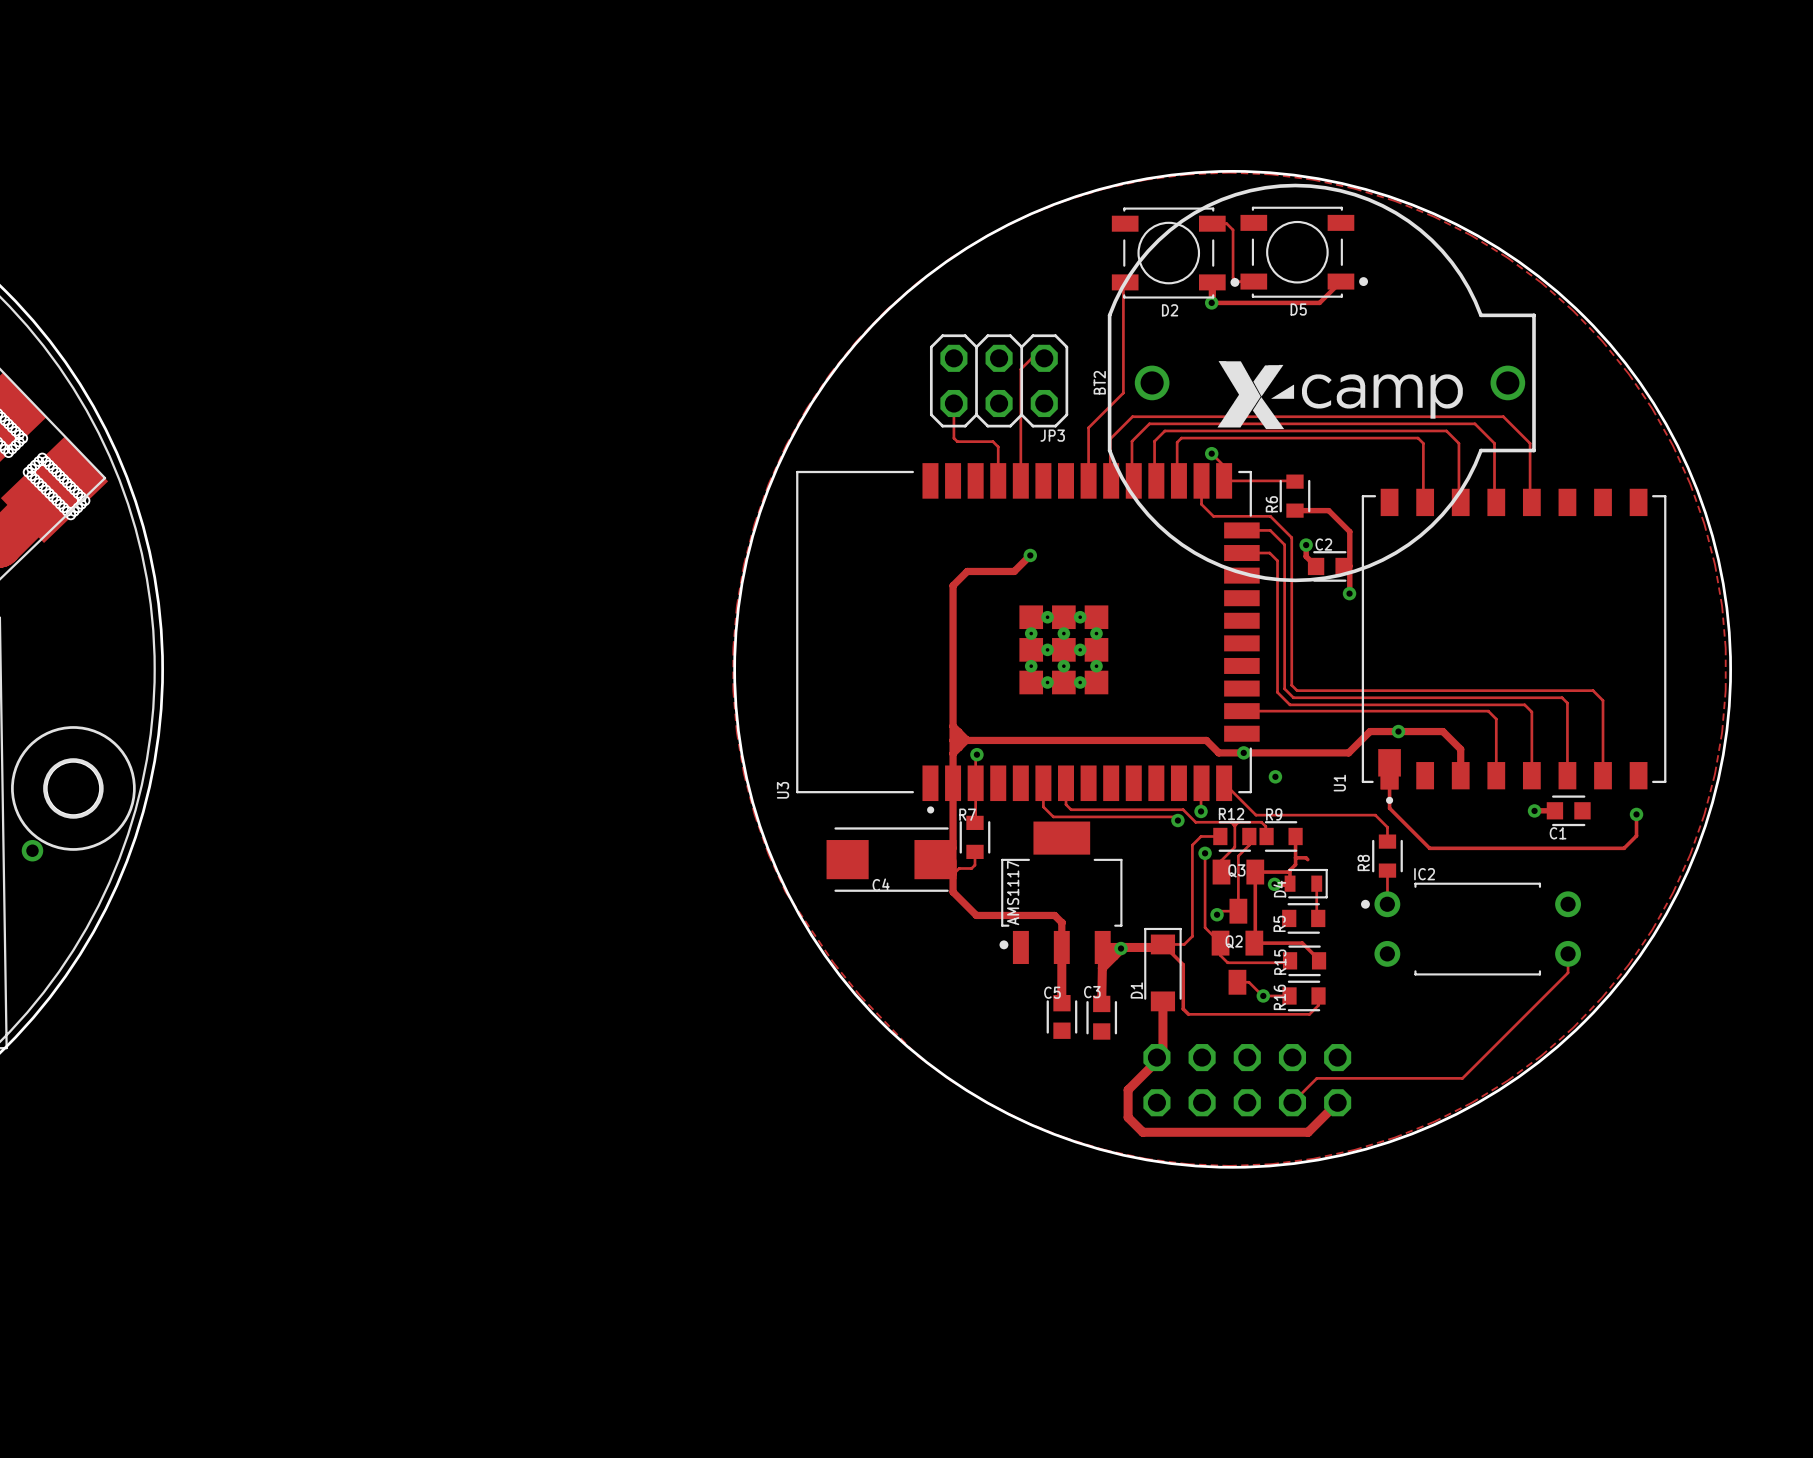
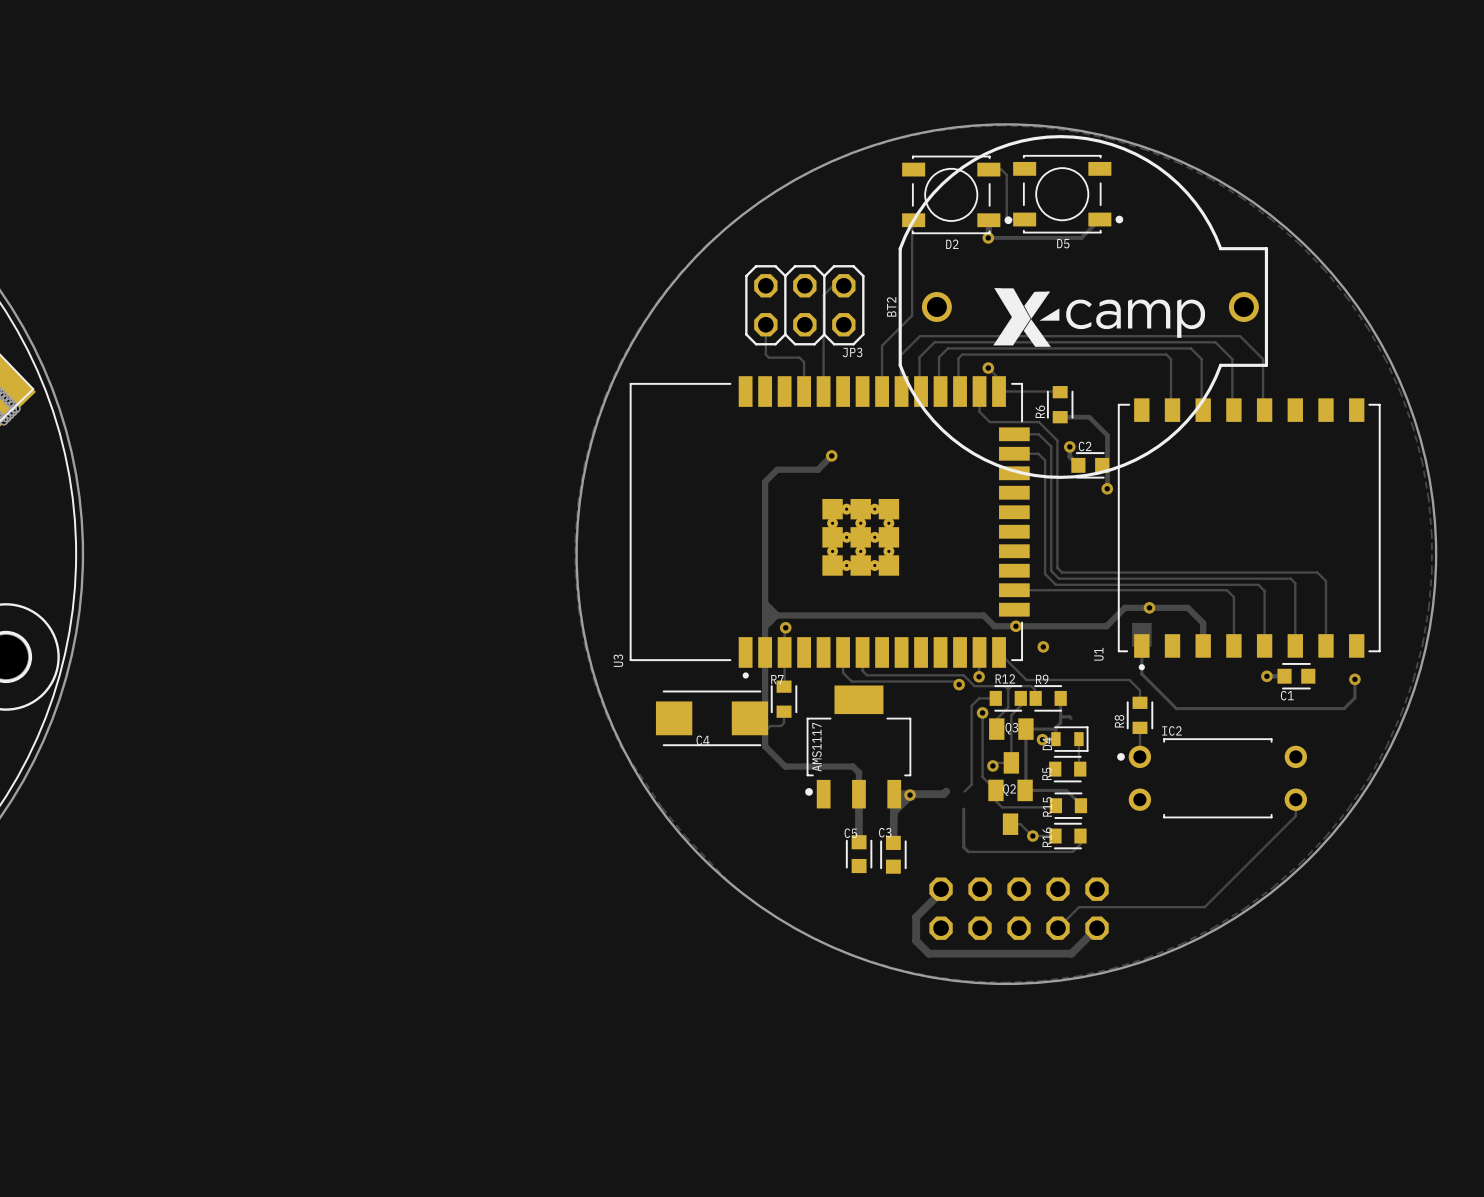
track: (1184, 944) (1162, 944) (1183, 964) -> none
D1: (1162, 969) -> none
track: (1162, 1001) (1162, 1051) -> none

